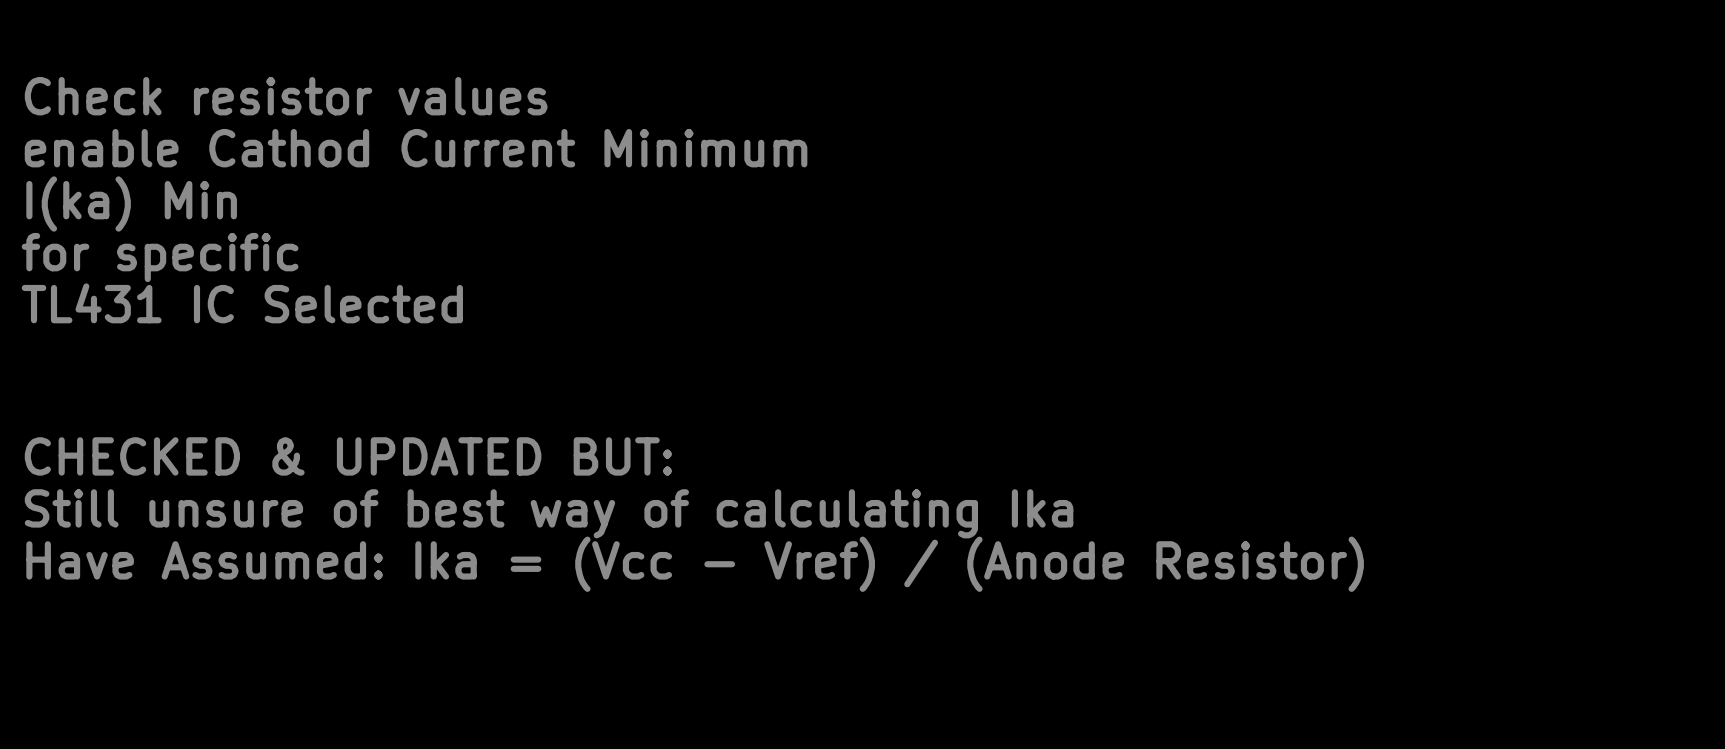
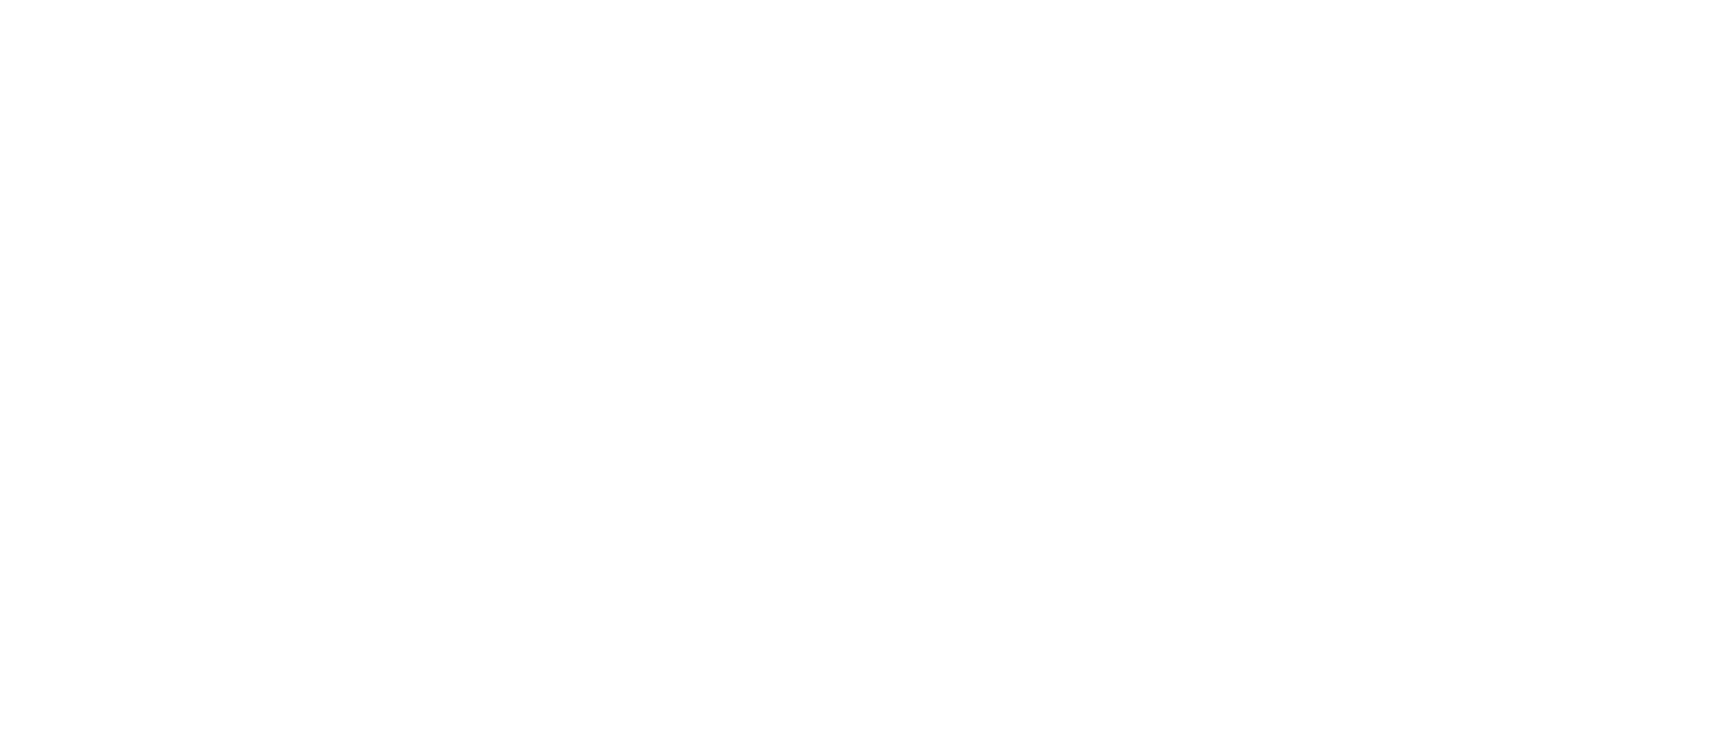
text: Check resistor values (286, 96) -> none
text: enable Cathod Current Minimum (416, 148) -> none
text: I(ka) Min (131, 204) -> none
text: for specific (160, 257) -> none
text: TL431 IC Selected (242, 303) -> none
text: CHECKED & UPDATED BUT: (348, 456) -> none
text: Still unsure of best way of calculating Ika (549, 513) -> none
text: Have Assumed: Ika = (Vcc - Vref) / (Anode Resistor) (695, 564) -> none

